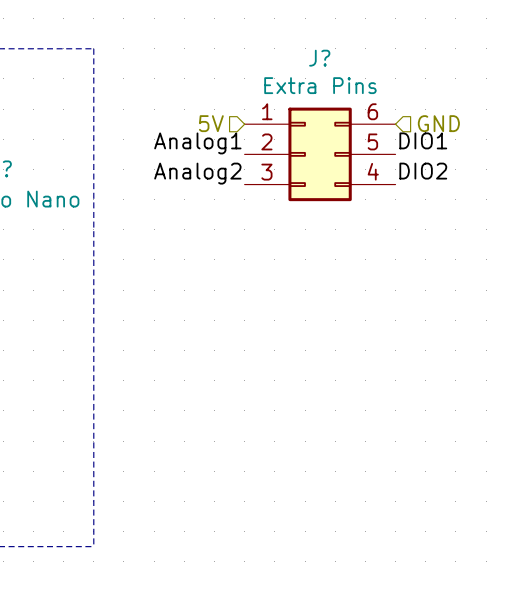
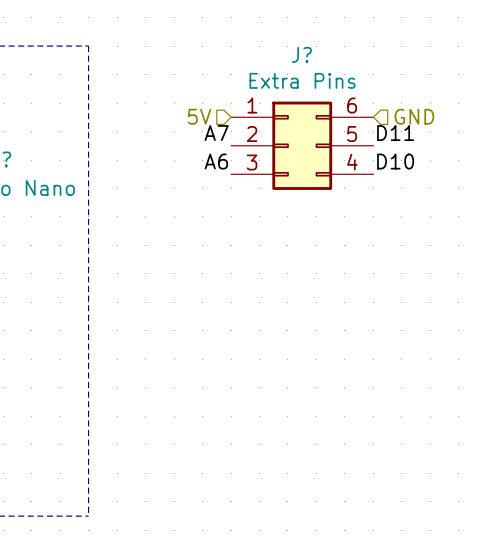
label: DIO1 (423, 140) -> D11 (395, 133)
label: Analog1 (197, 143) -> A7 (216, 133)
label: DIO2 (423, 171) -> D10 (395, 161)
label: Analog2 (197, 173) -> A6 (216, 161)

